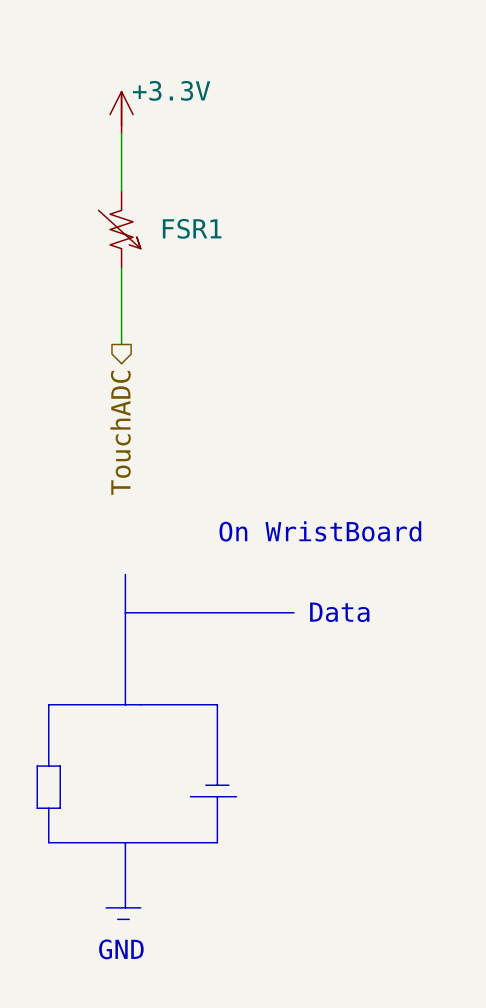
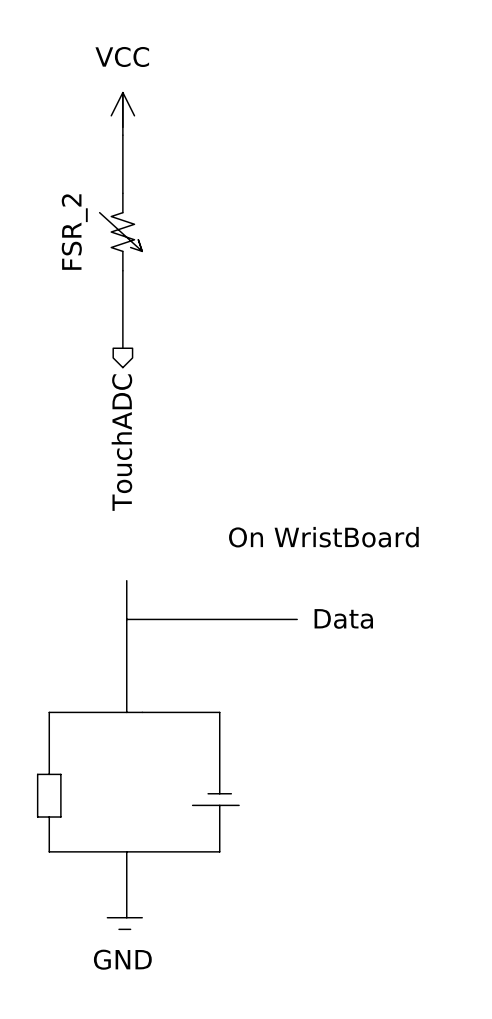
power symbol: +3.3V (121, 112) -> VCC (122, 113)
FSR1 name: FSR1 (192, 228) -> FSR_2 (74, 232)

